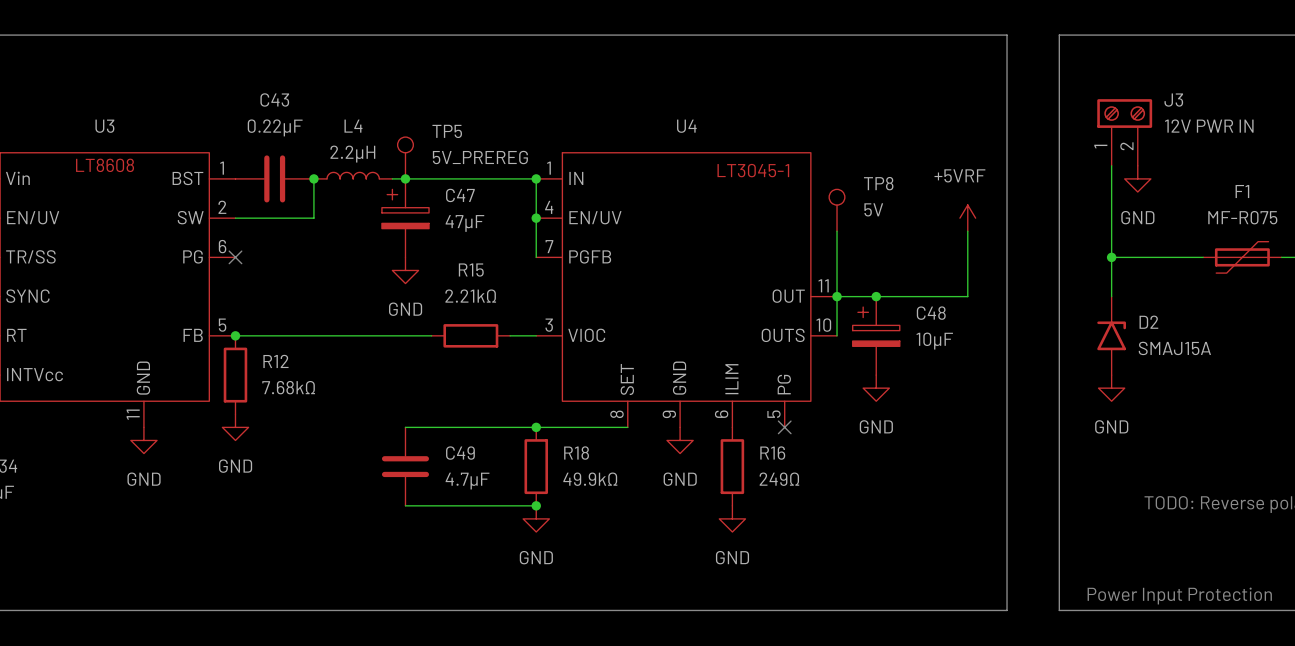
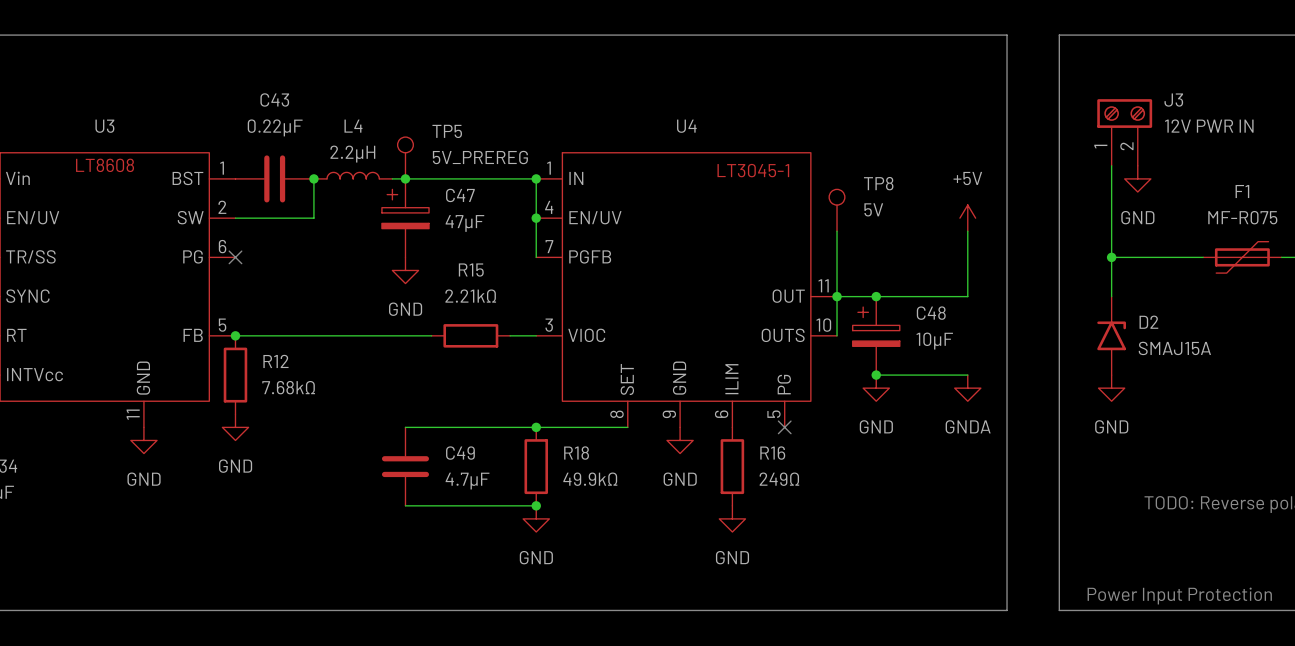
power symbol: +5VRF (967, 218) -> +5V (967, 218)
wire: none -> (876, 375) (967, 375)
junction: none -> (876, 375)
power symbol: none -> GNDA (967, 388)

